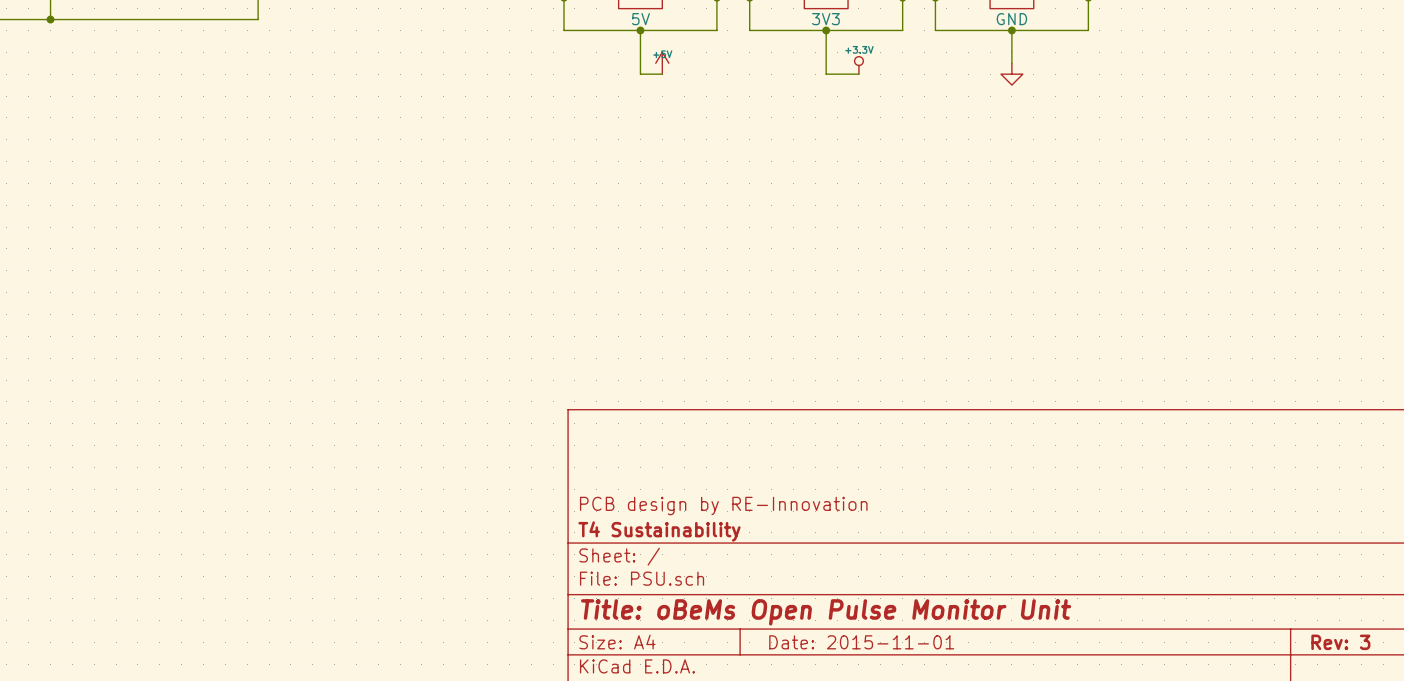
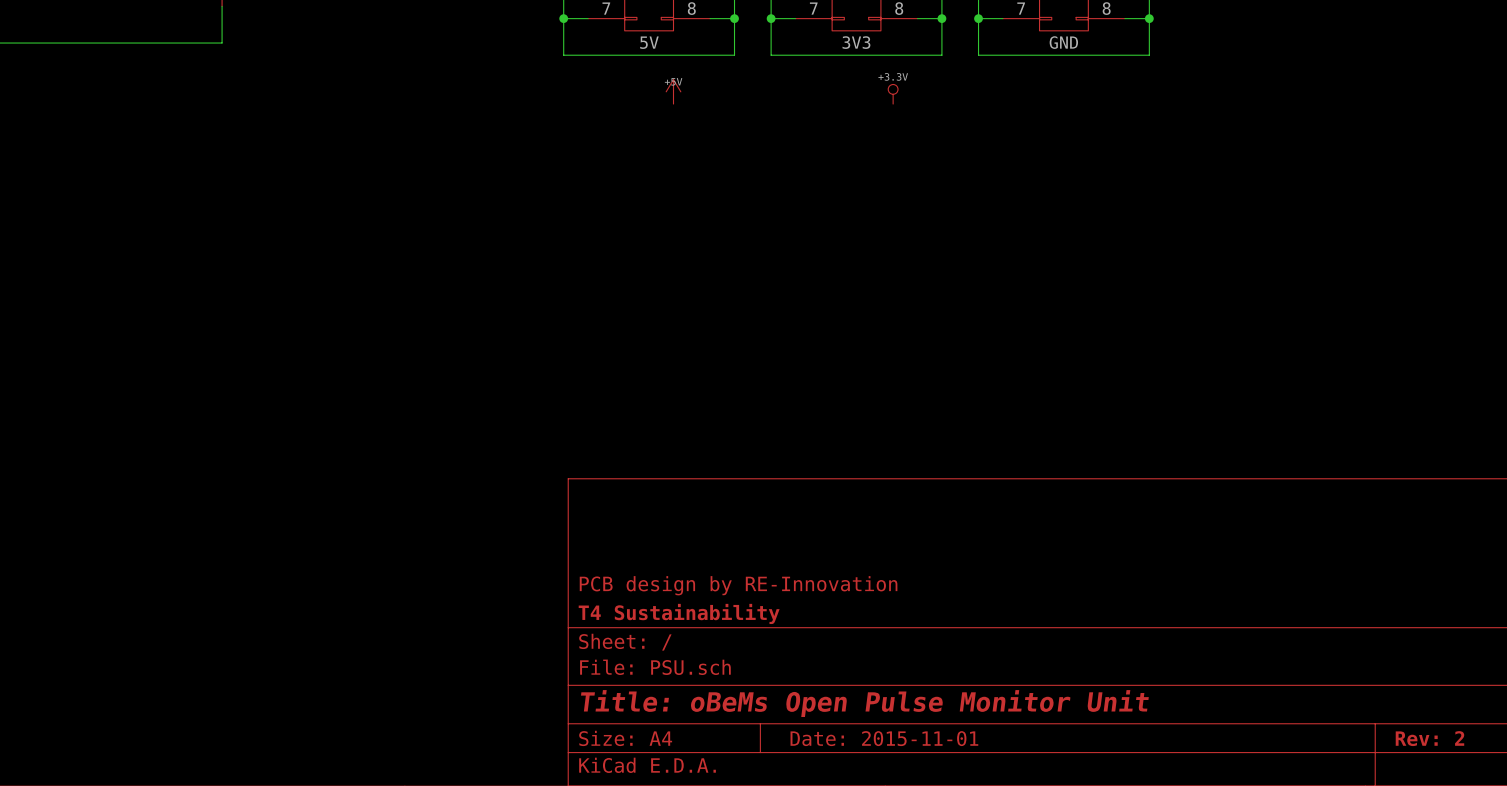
wire: (640, 30) (640, 74) (662, 74) -> none
junction: (640, 30) -> none
wire: (826, 30) (826, 74) (858, 74) -> none
junction: (826, 30) -> none
wire: (1011, 30) (1011, 63) -> none
junction: (1011, 30) -> none
power symbol: (1011, 74) -> none
title block: Rev: 3 (1340, 642) -> Rev: 2 (1429, 738)

